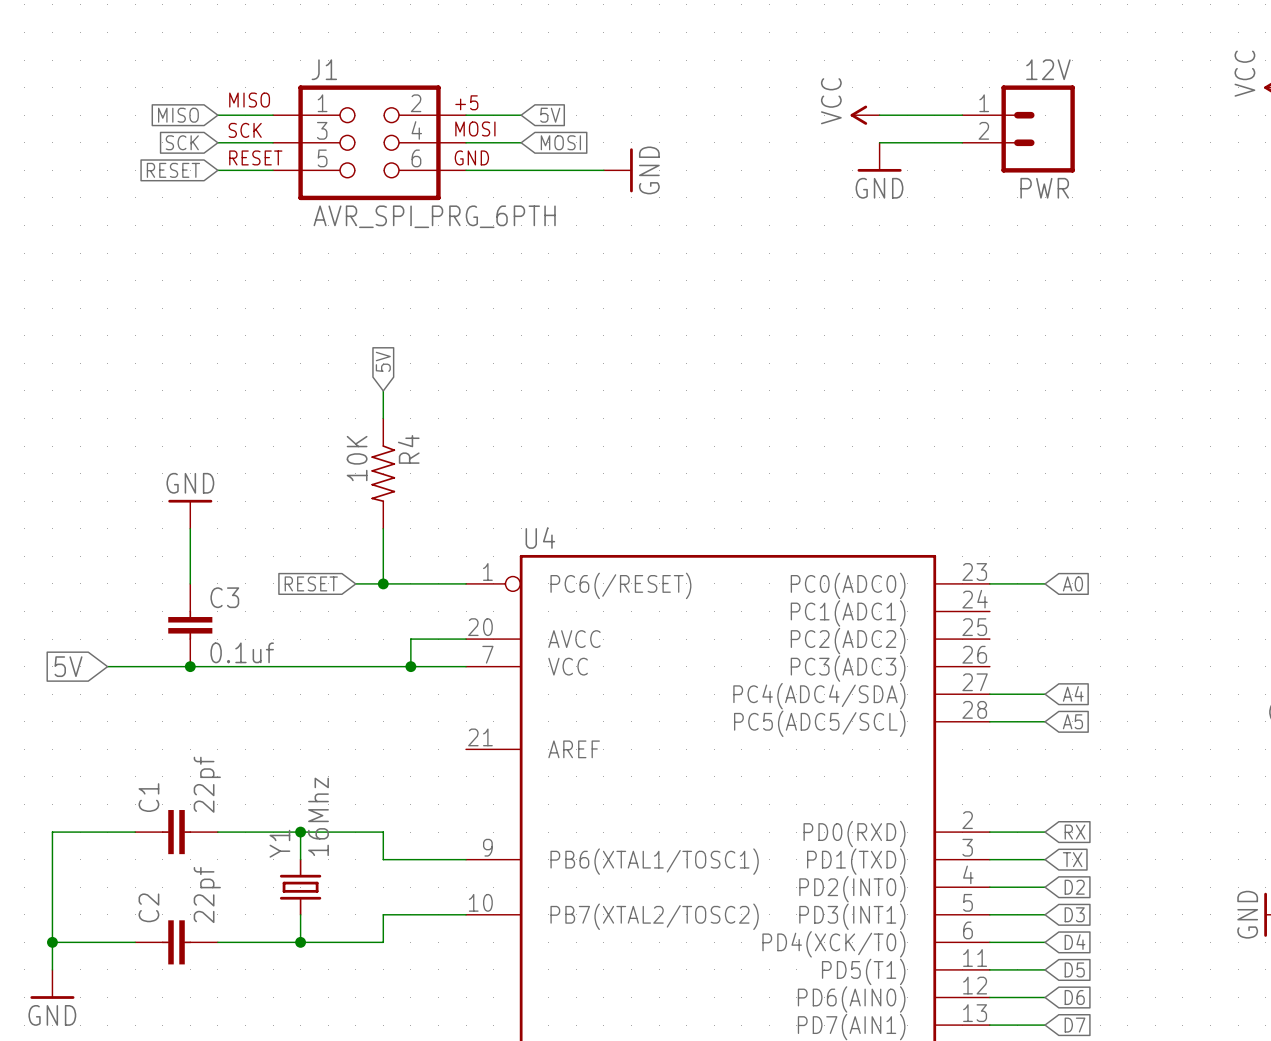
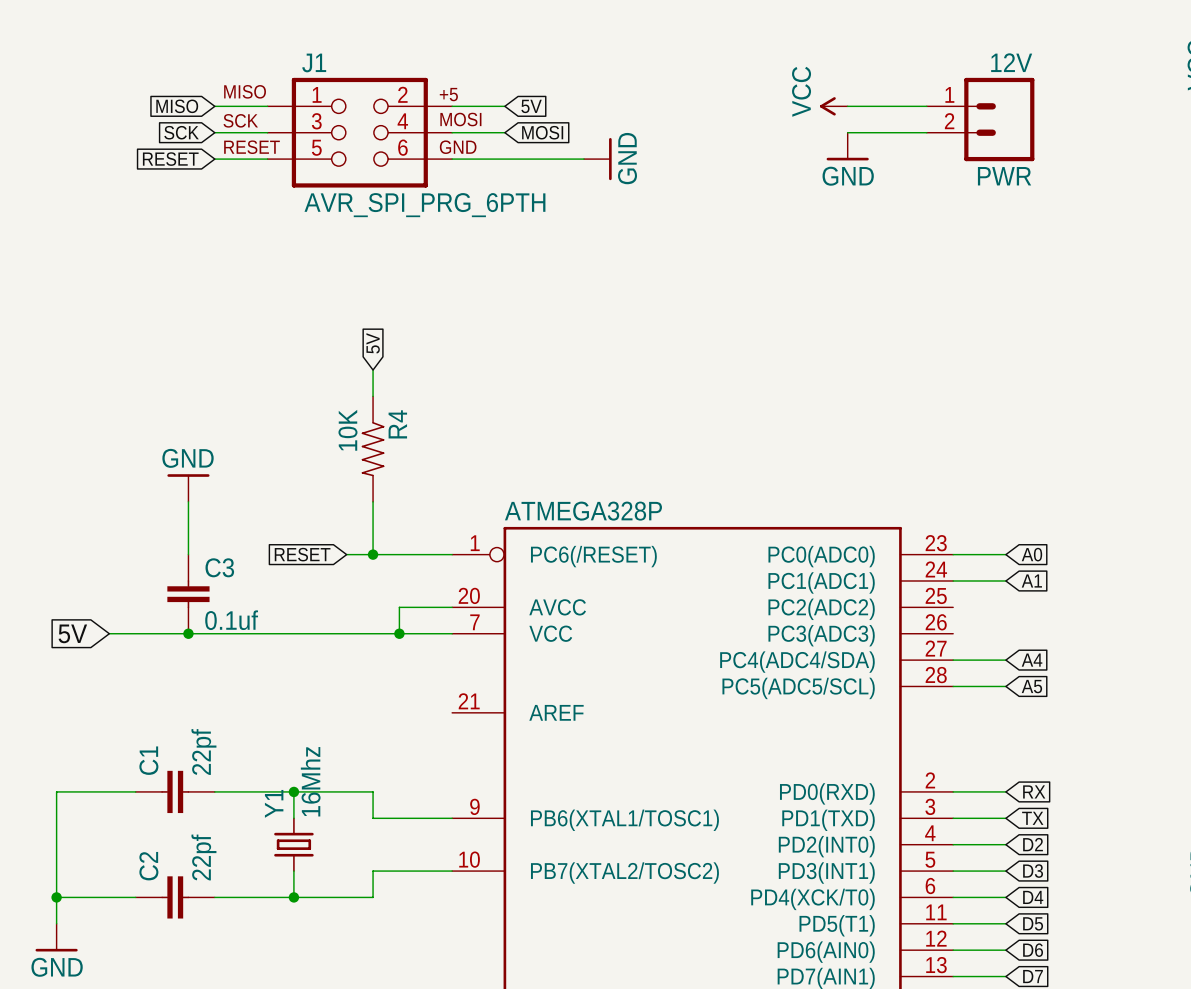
U4 name: U4 (540, 537) -> ATMEGA328P (583, 511)
wire: none -> (953, 580) (1005, 580)
global label: none -> A1 (1031, 580)

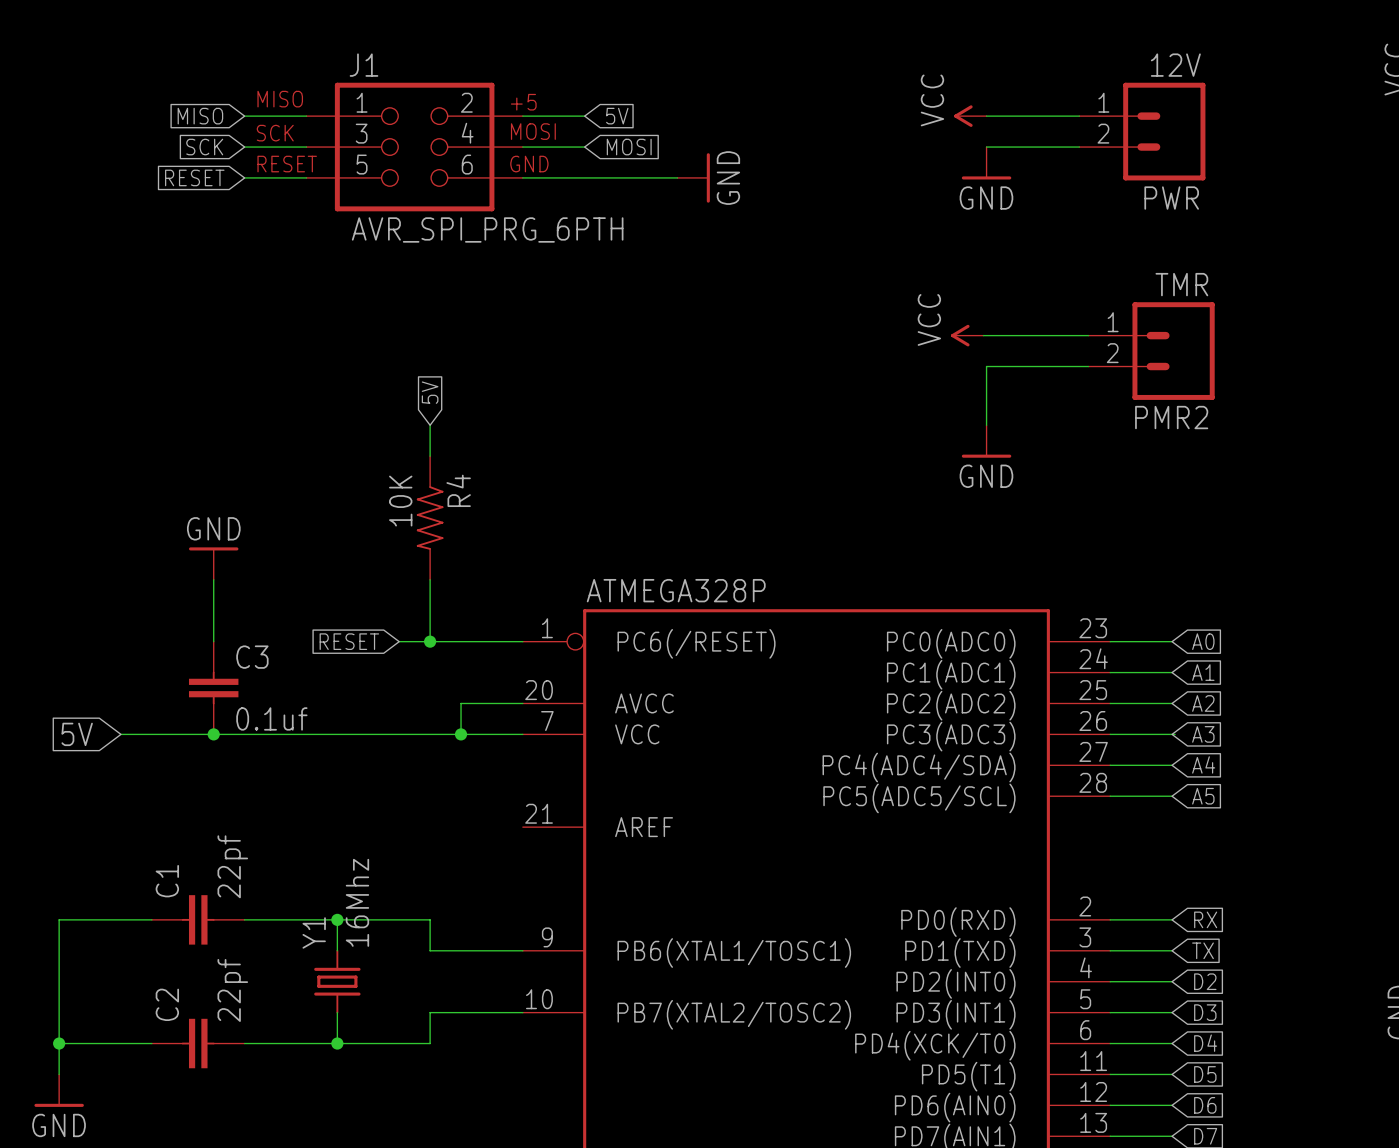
power symbol: none -> VCC (967, 335)
wire: none -> (983, 335) (1088, 335)
PMR2: none -> TMR (1151, 351)
wire: none -> (1088, 366) (986, 366) (986, 425)
power symbol: none -> GND (986, 441)
wire: none -> (1110, 703) (1172, 703)
global label: none -> A2 (1203, 703)
wire: none -> (1110, 734) (1175, 734)
global label: none -> A3 (1203, 734)

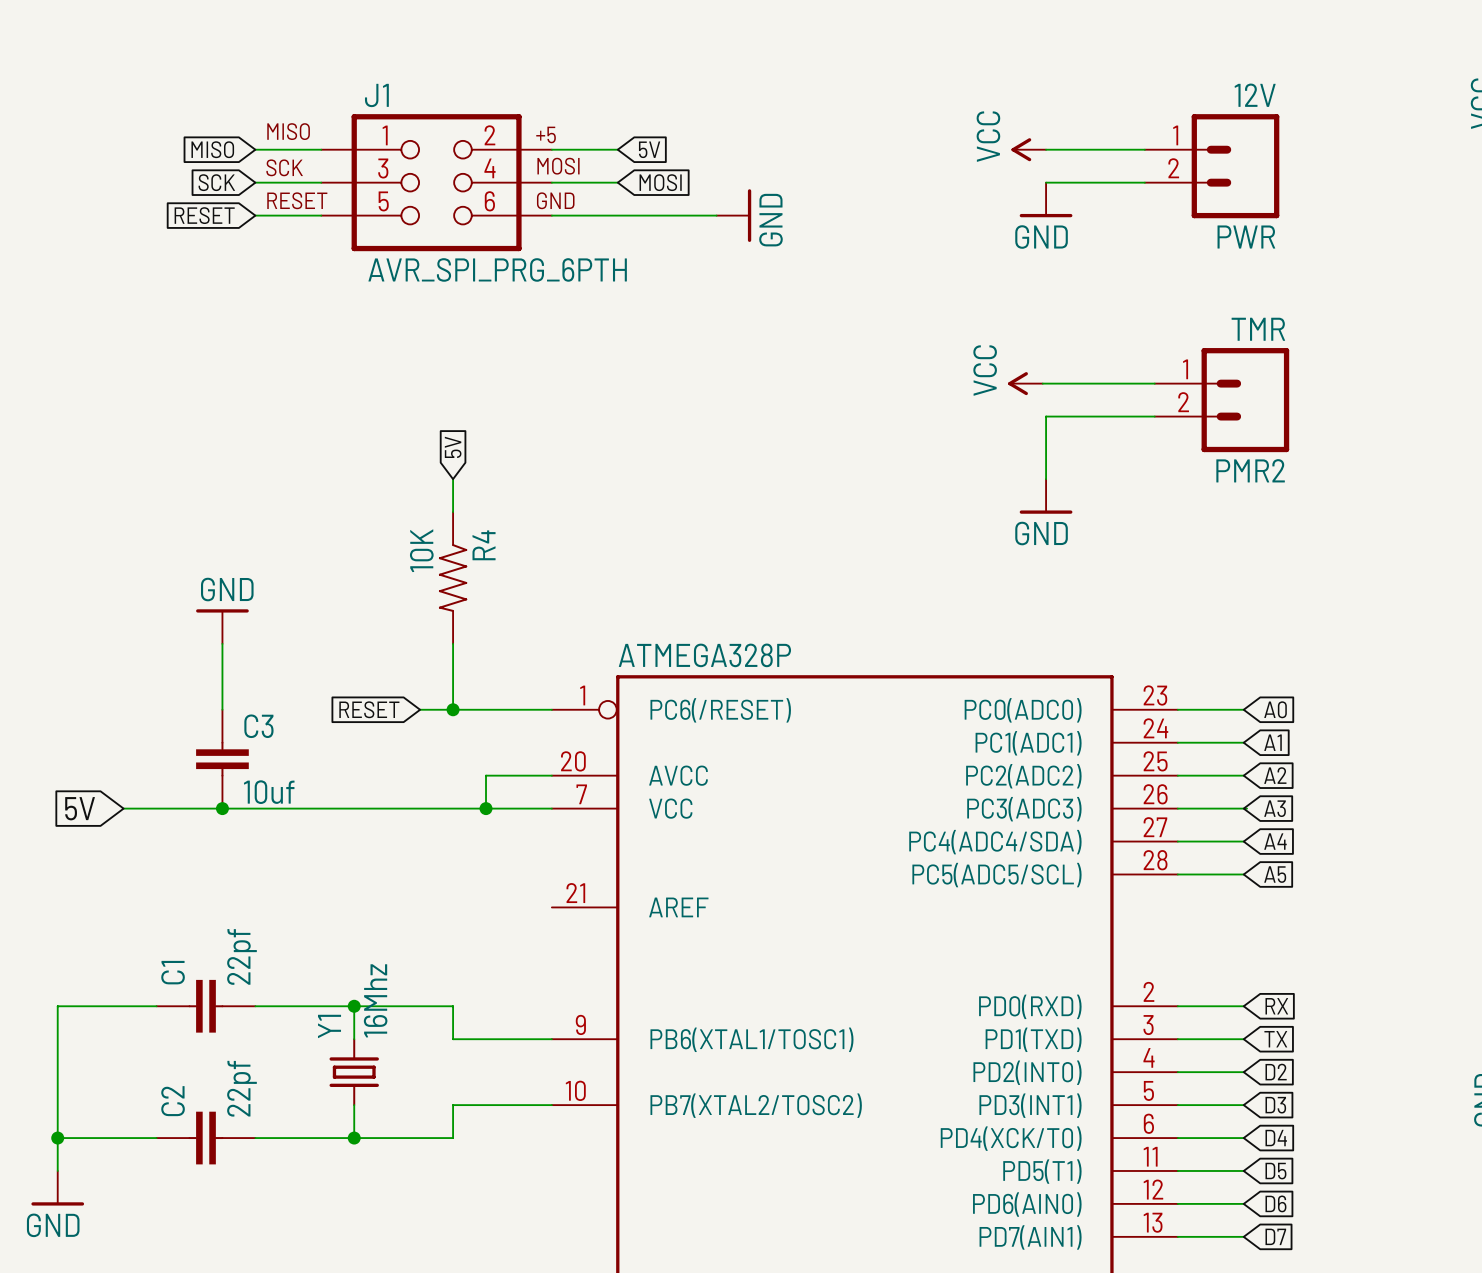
C3 value: 0.1uf (271, 718) -> 10uf (269, 792)

